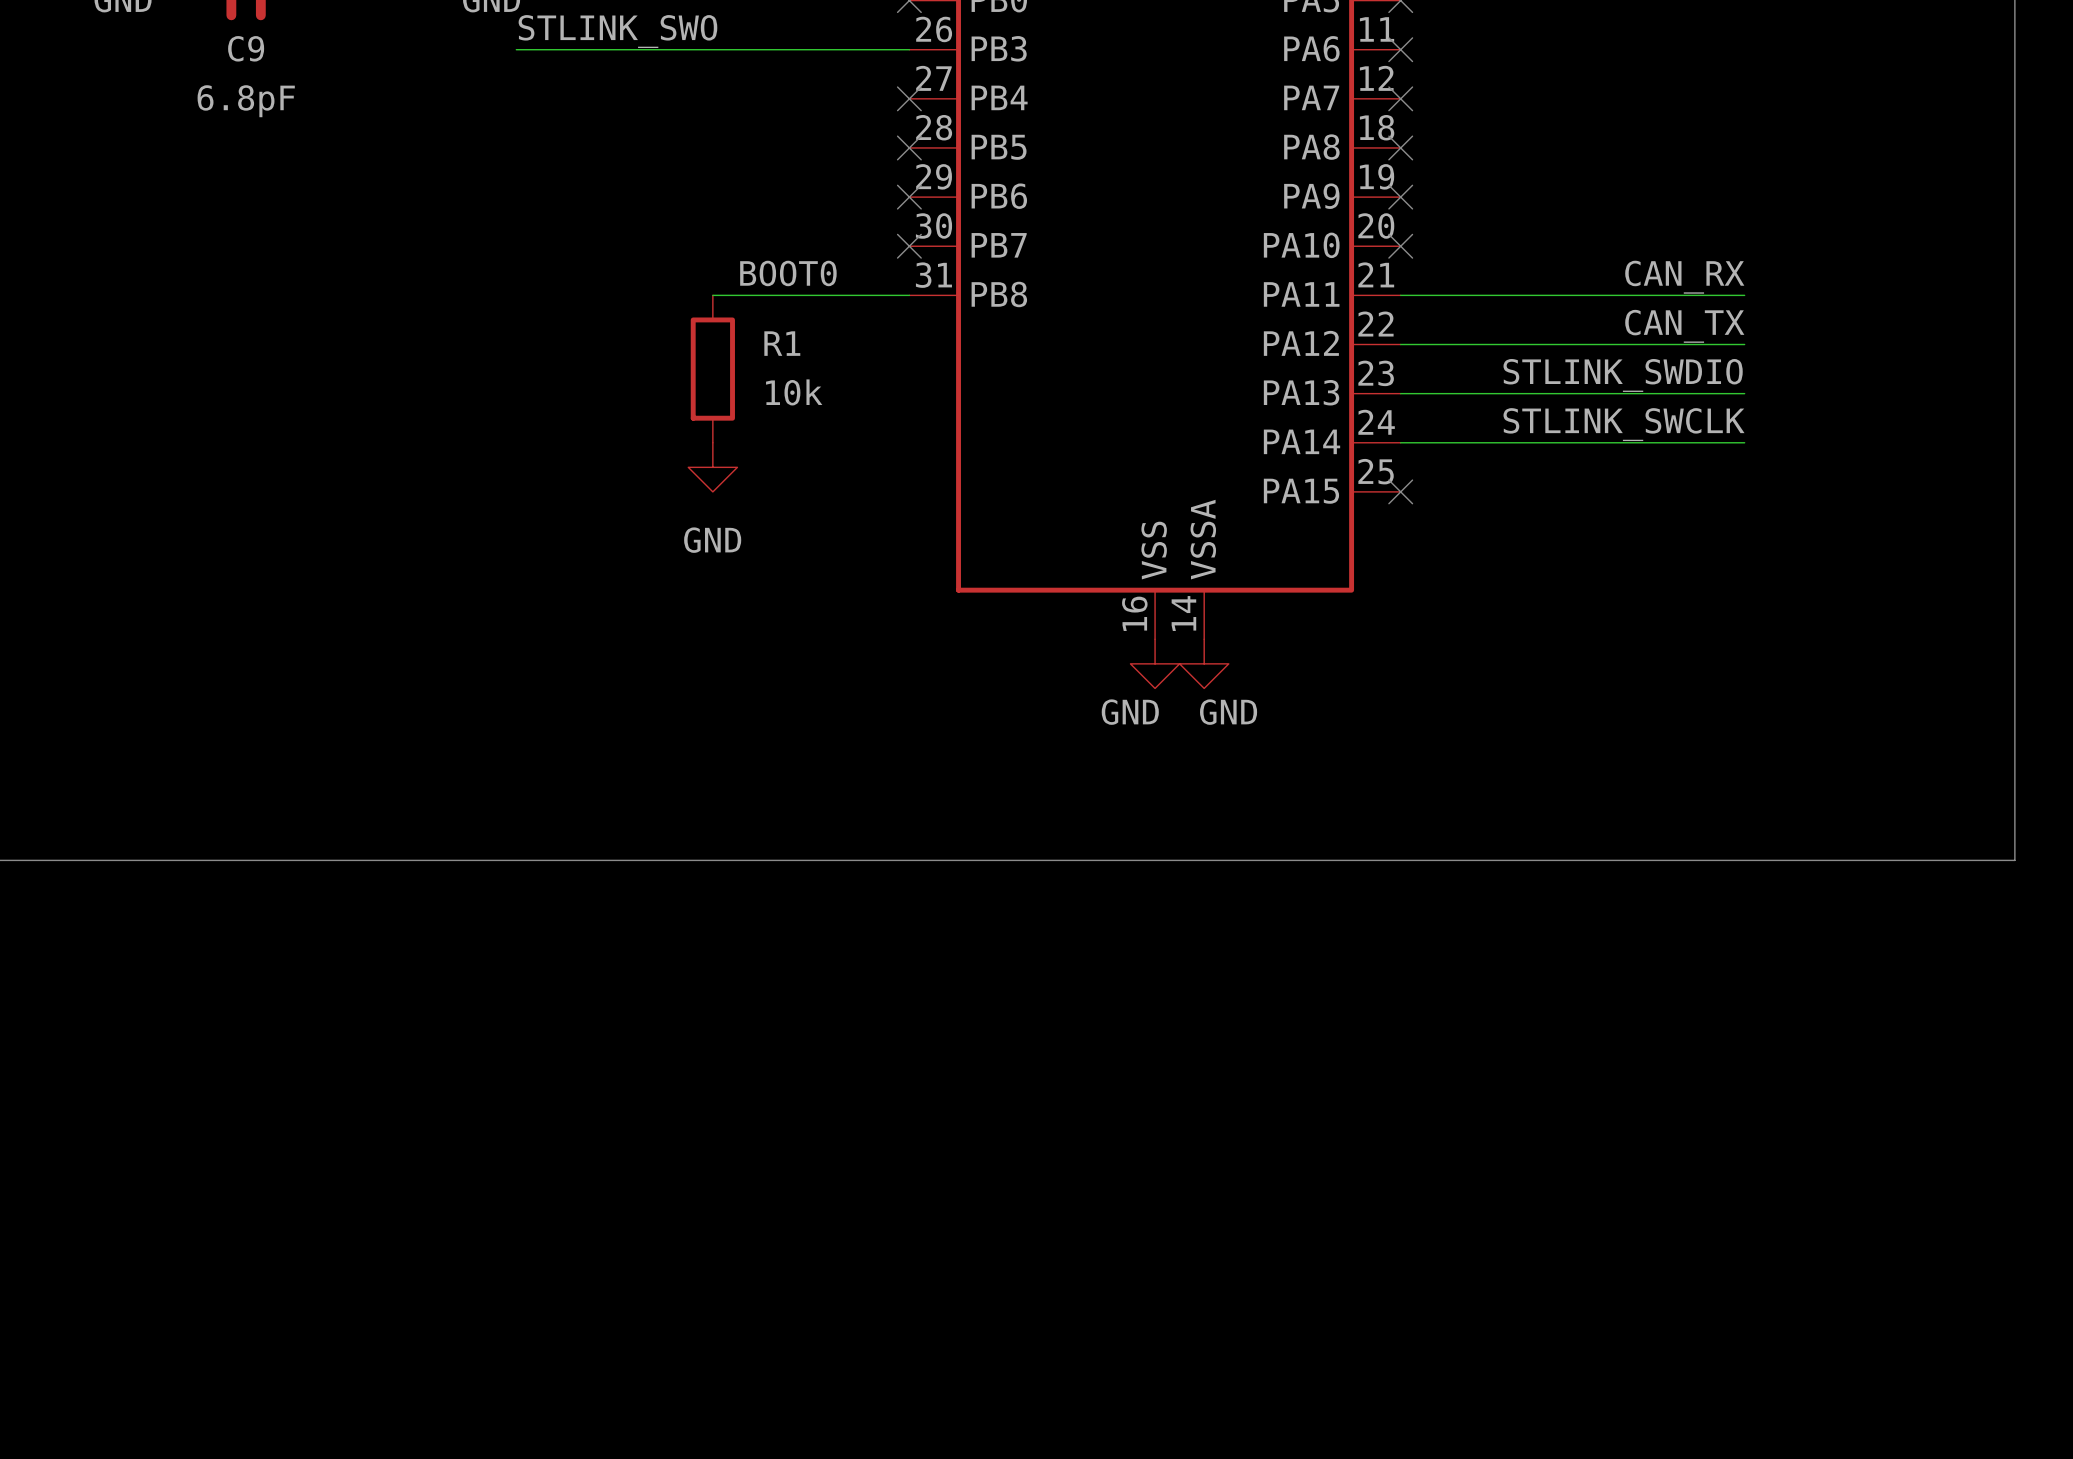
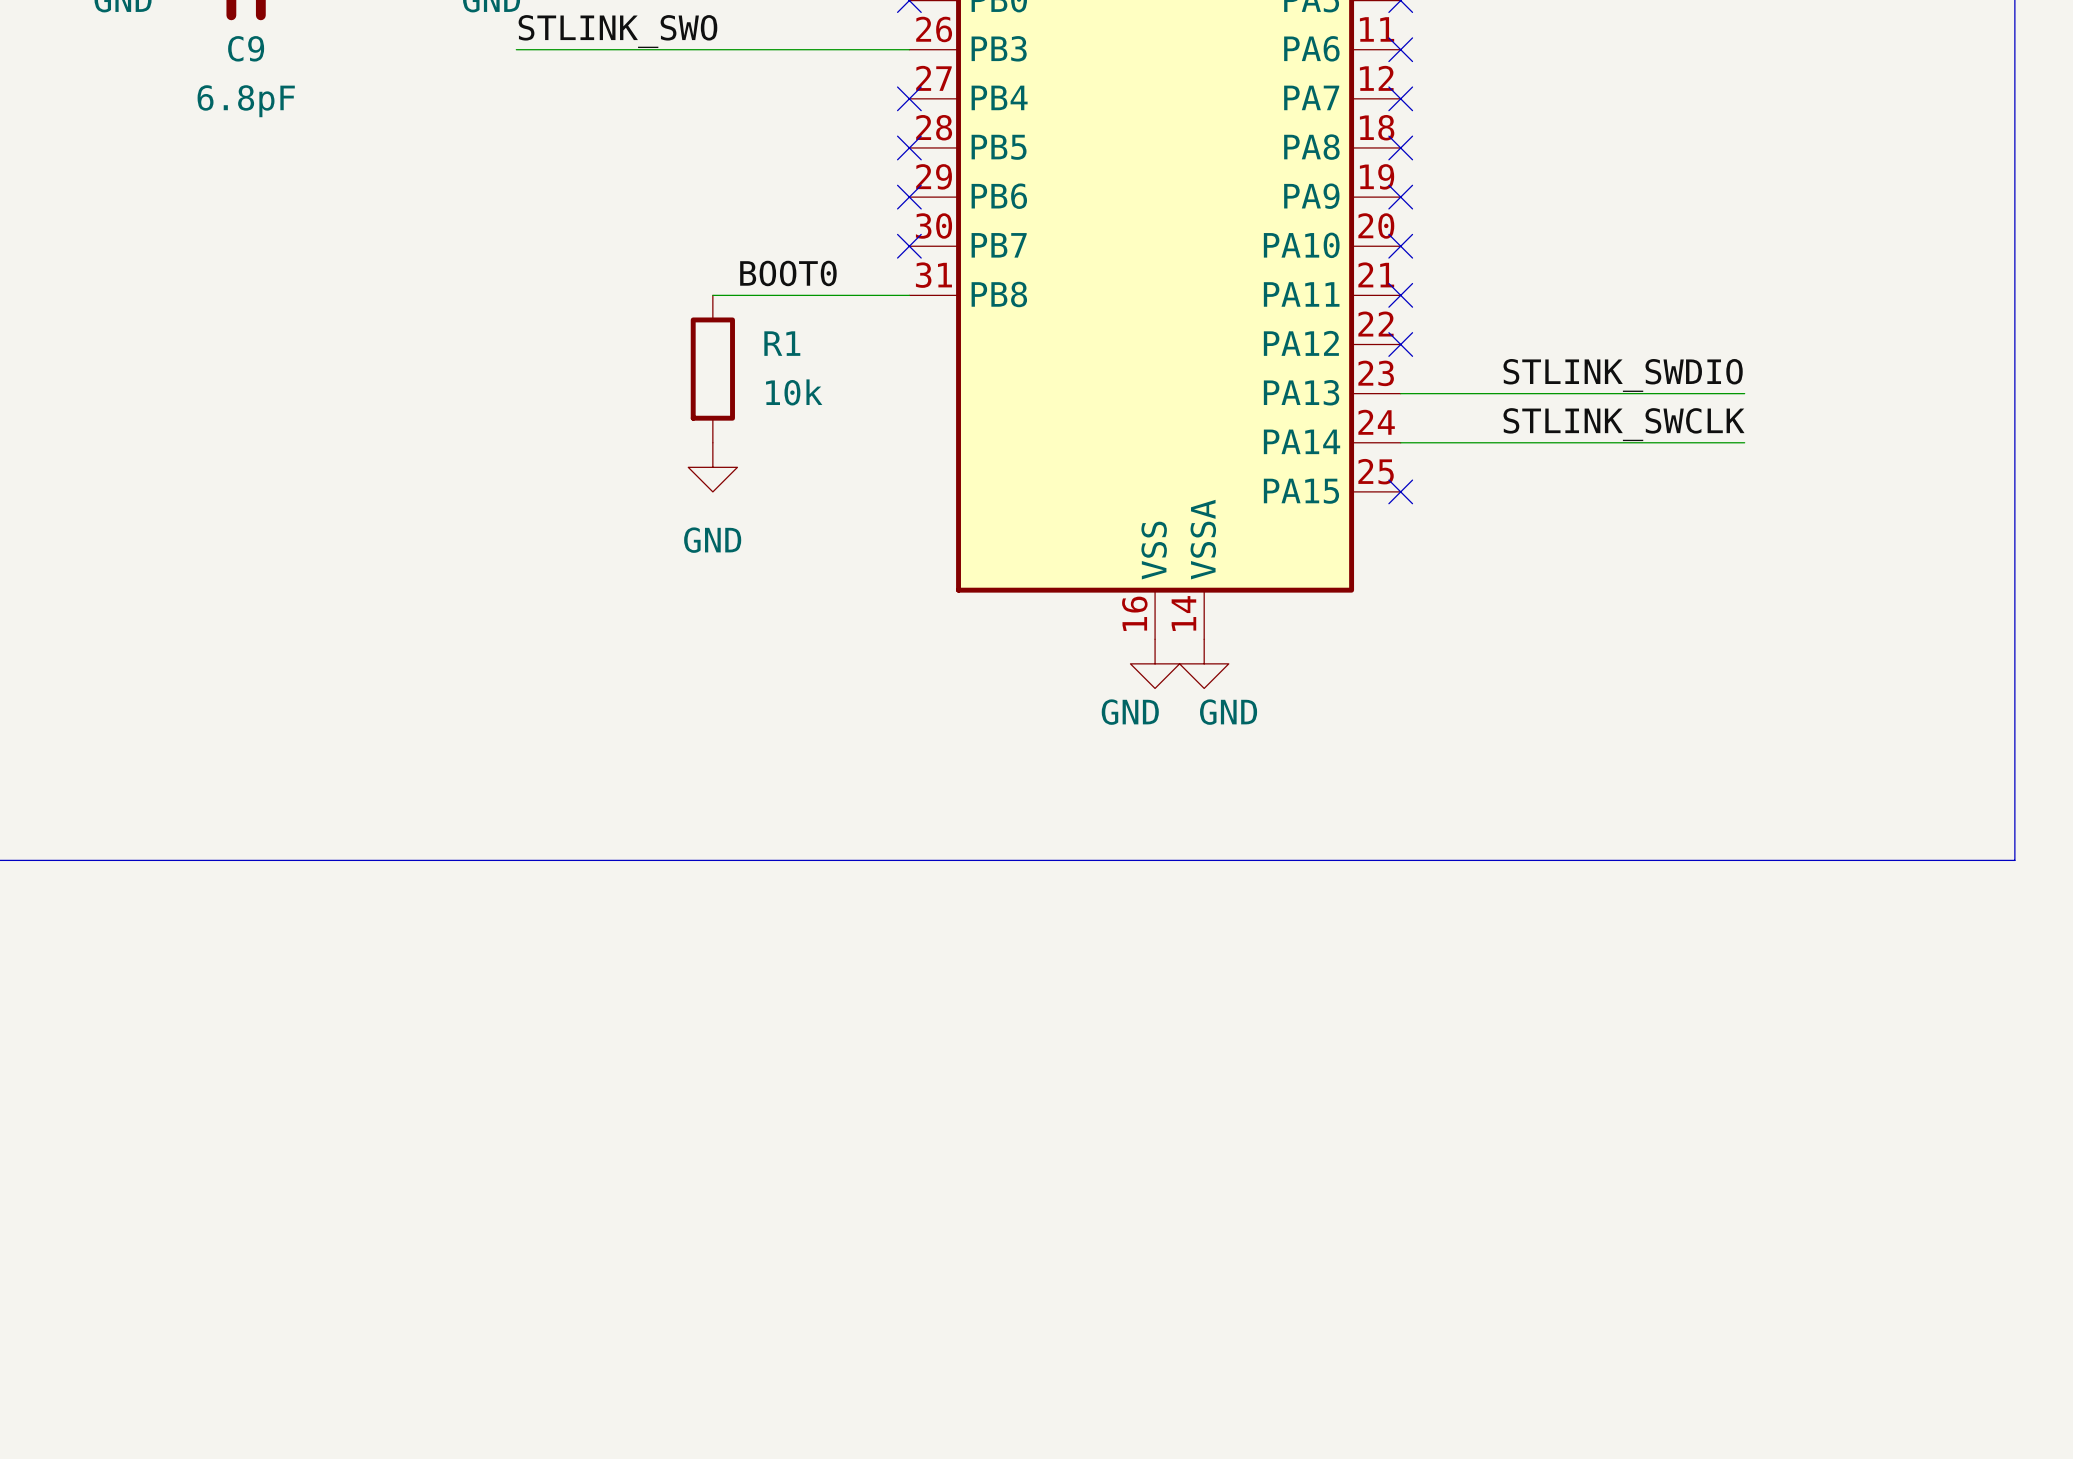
label: CAN_RX (1684, 277) -> none
wire: (1400, 295) (1744, 295) -> none
no-connect mark: none -> (1400, 295)
label: CAN_TX (1684, 326) -> none
wire: (1400, 344) (1744, 344) -> none
no-connect mark: none -> (1400, 344)

